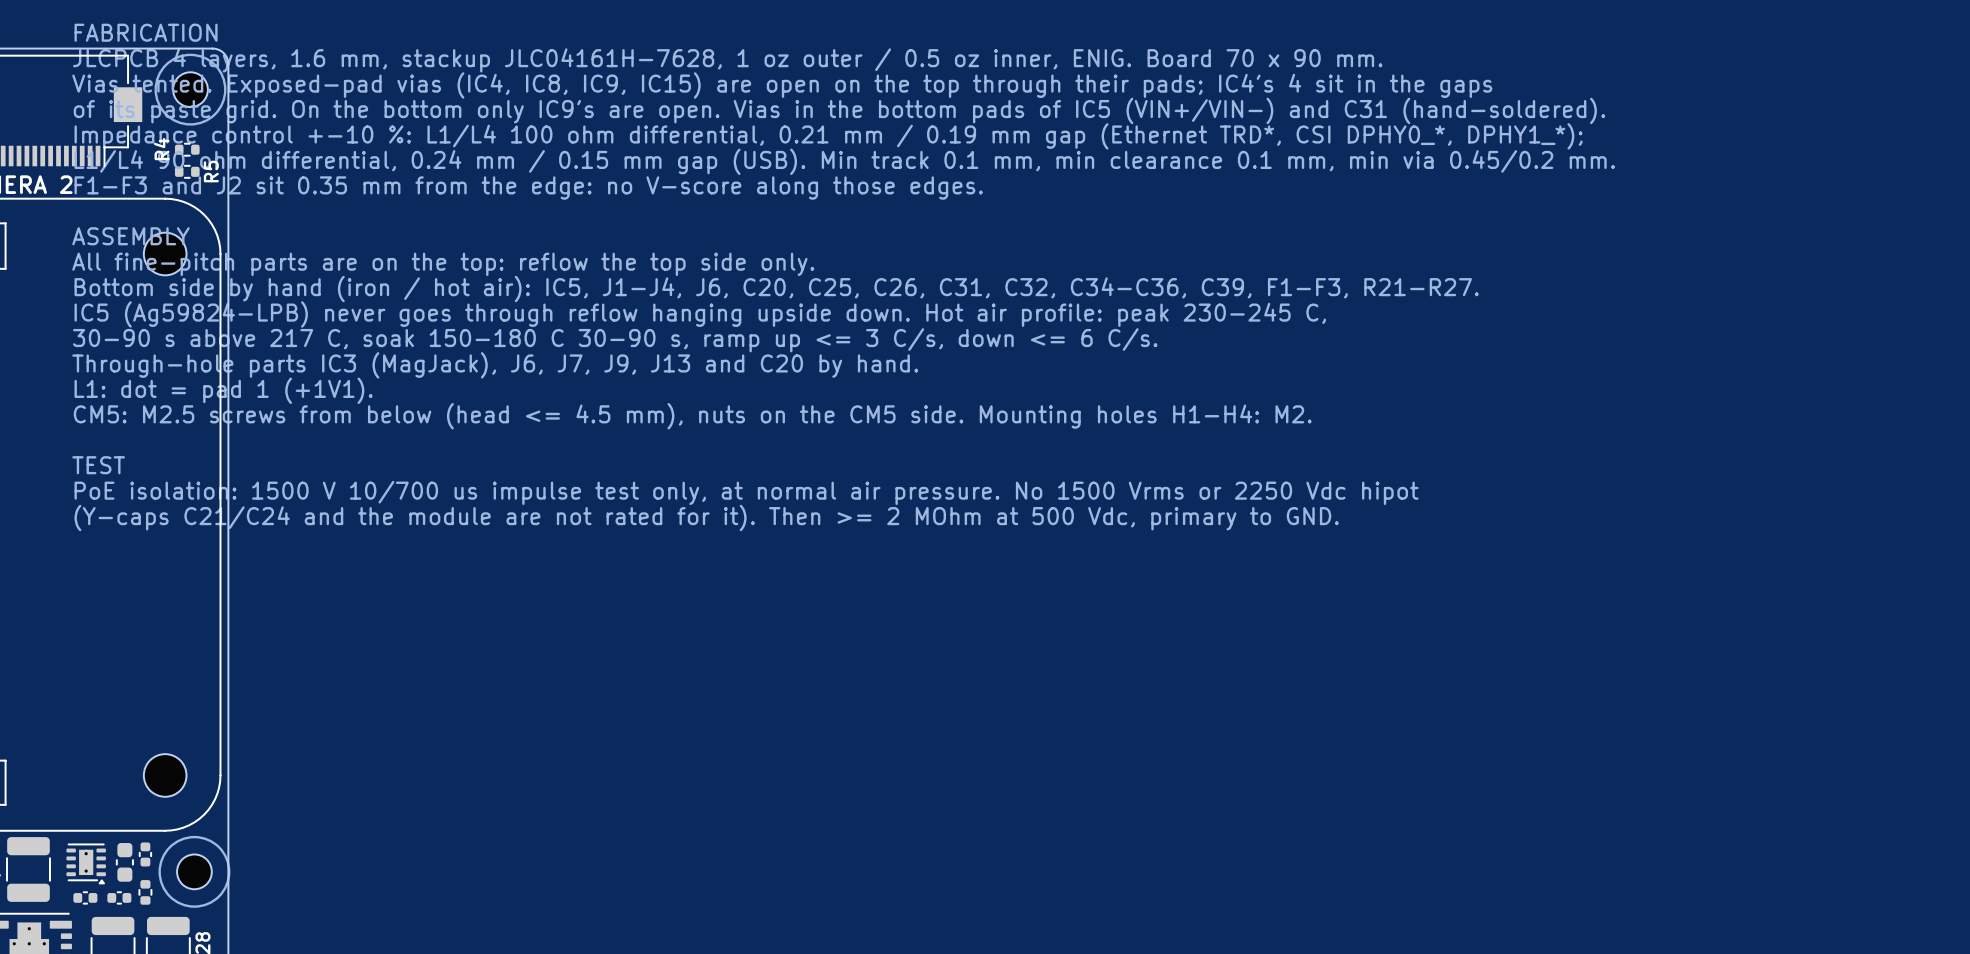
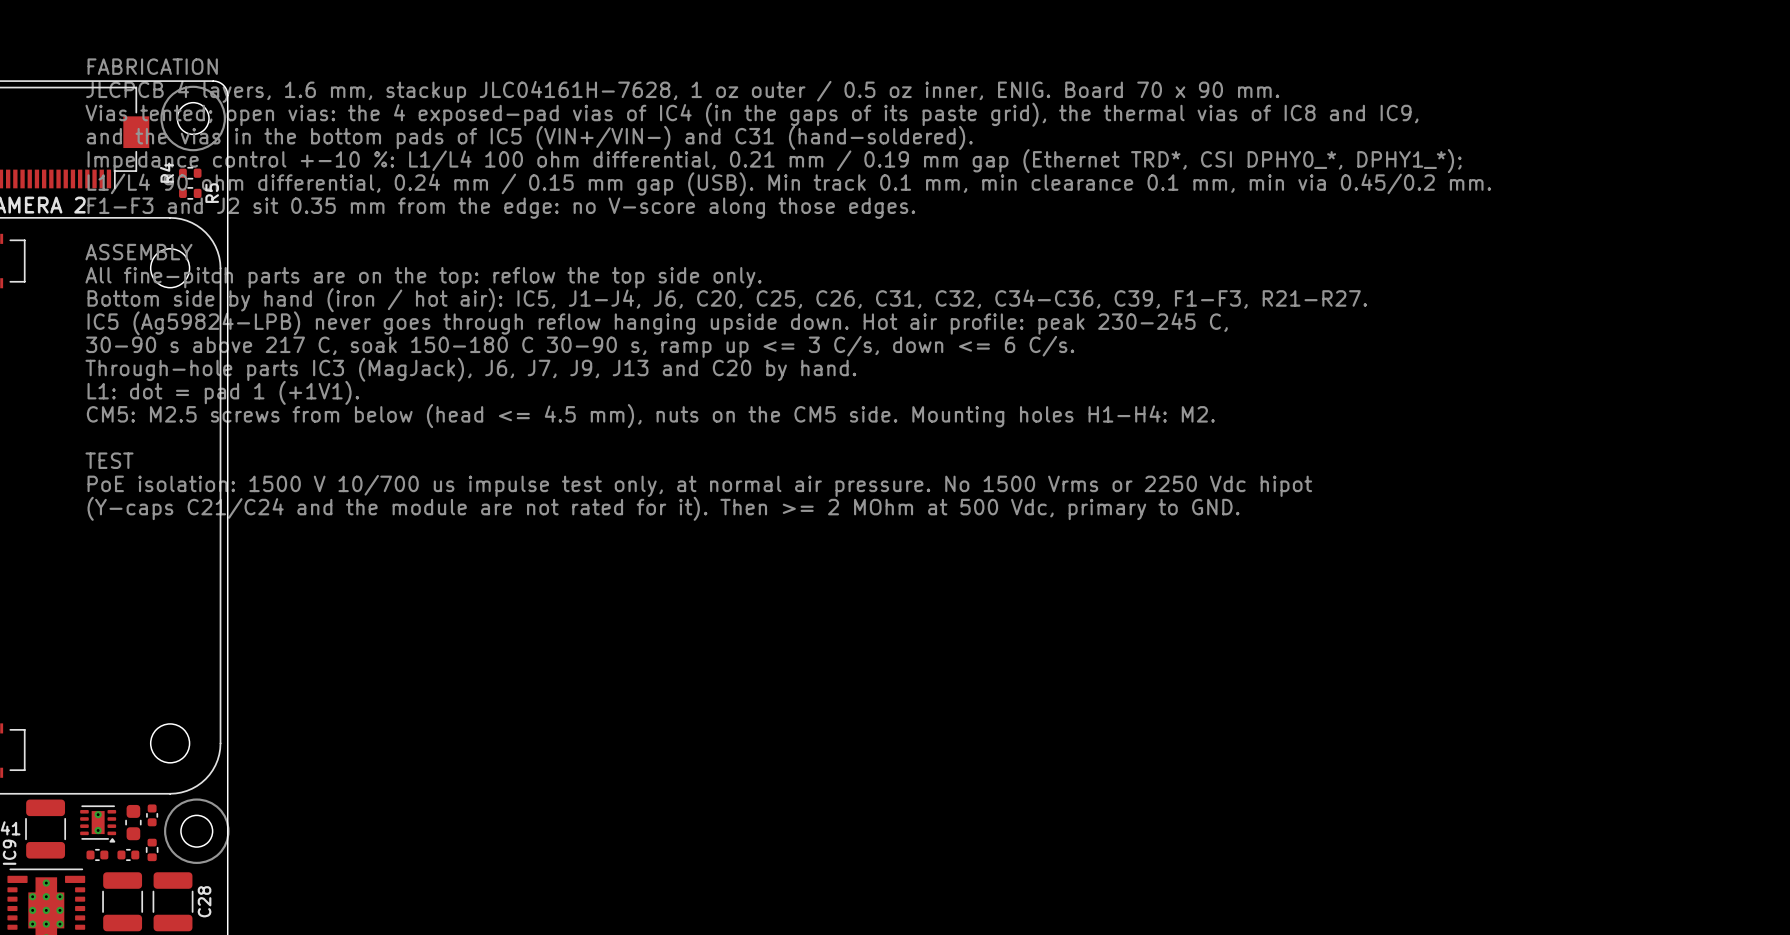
text: Vias tented. Exposed-pad vias (IC4, IC8, IC9, IC15) are open on the top through their pads; IC4's 4 sit in the gaps (782, 85) -> Vias tented; open vias: the 4 exposed-pad vias of IC4 (in the gaps of its paste grid), the thermal vias of IC8 and IC9, (751, 114)
text: of its paste grid. On the bottom only IC9's are open. Vias in the bottom pads of IC5 (VIN+/VIN-) and C31 (hand-soldered). (839, 110) -> and the vias in the bottom pads of IC5 (VIN+/VIN-) and C31 (hand-soldered). (529, 137)

